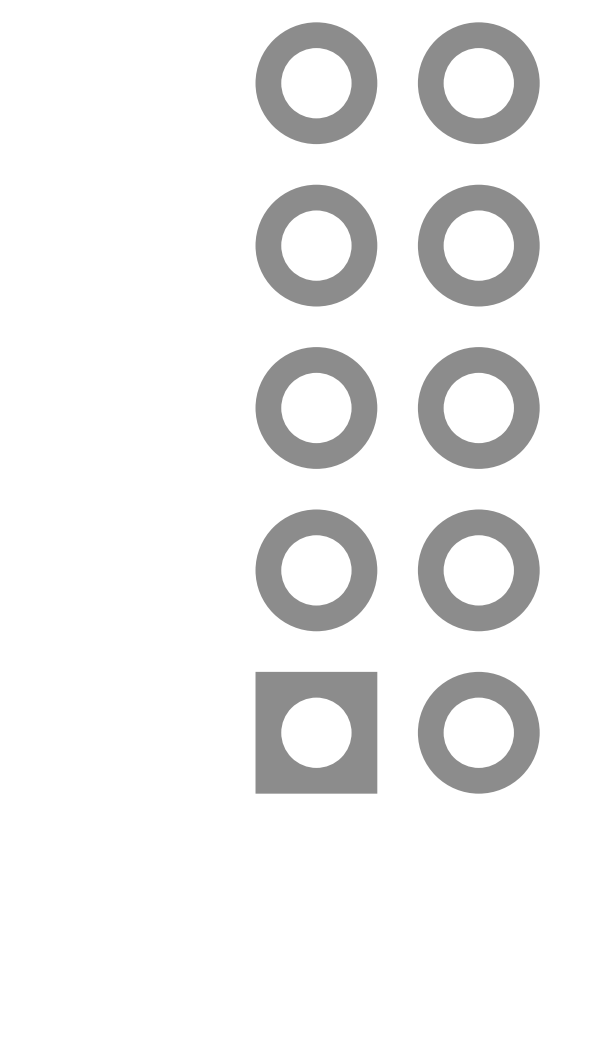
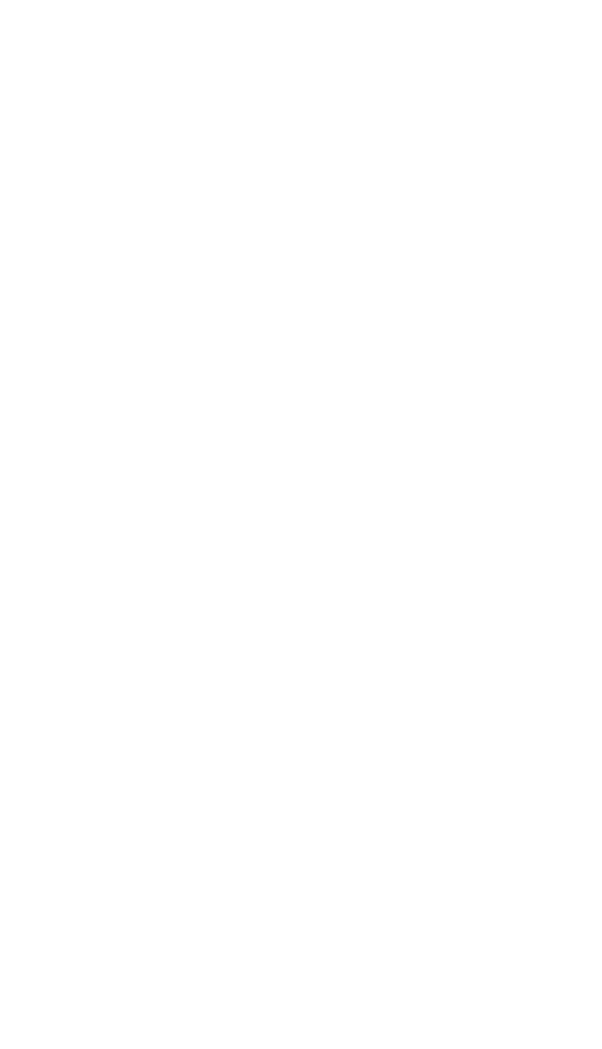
part: (397, 407) -> none

